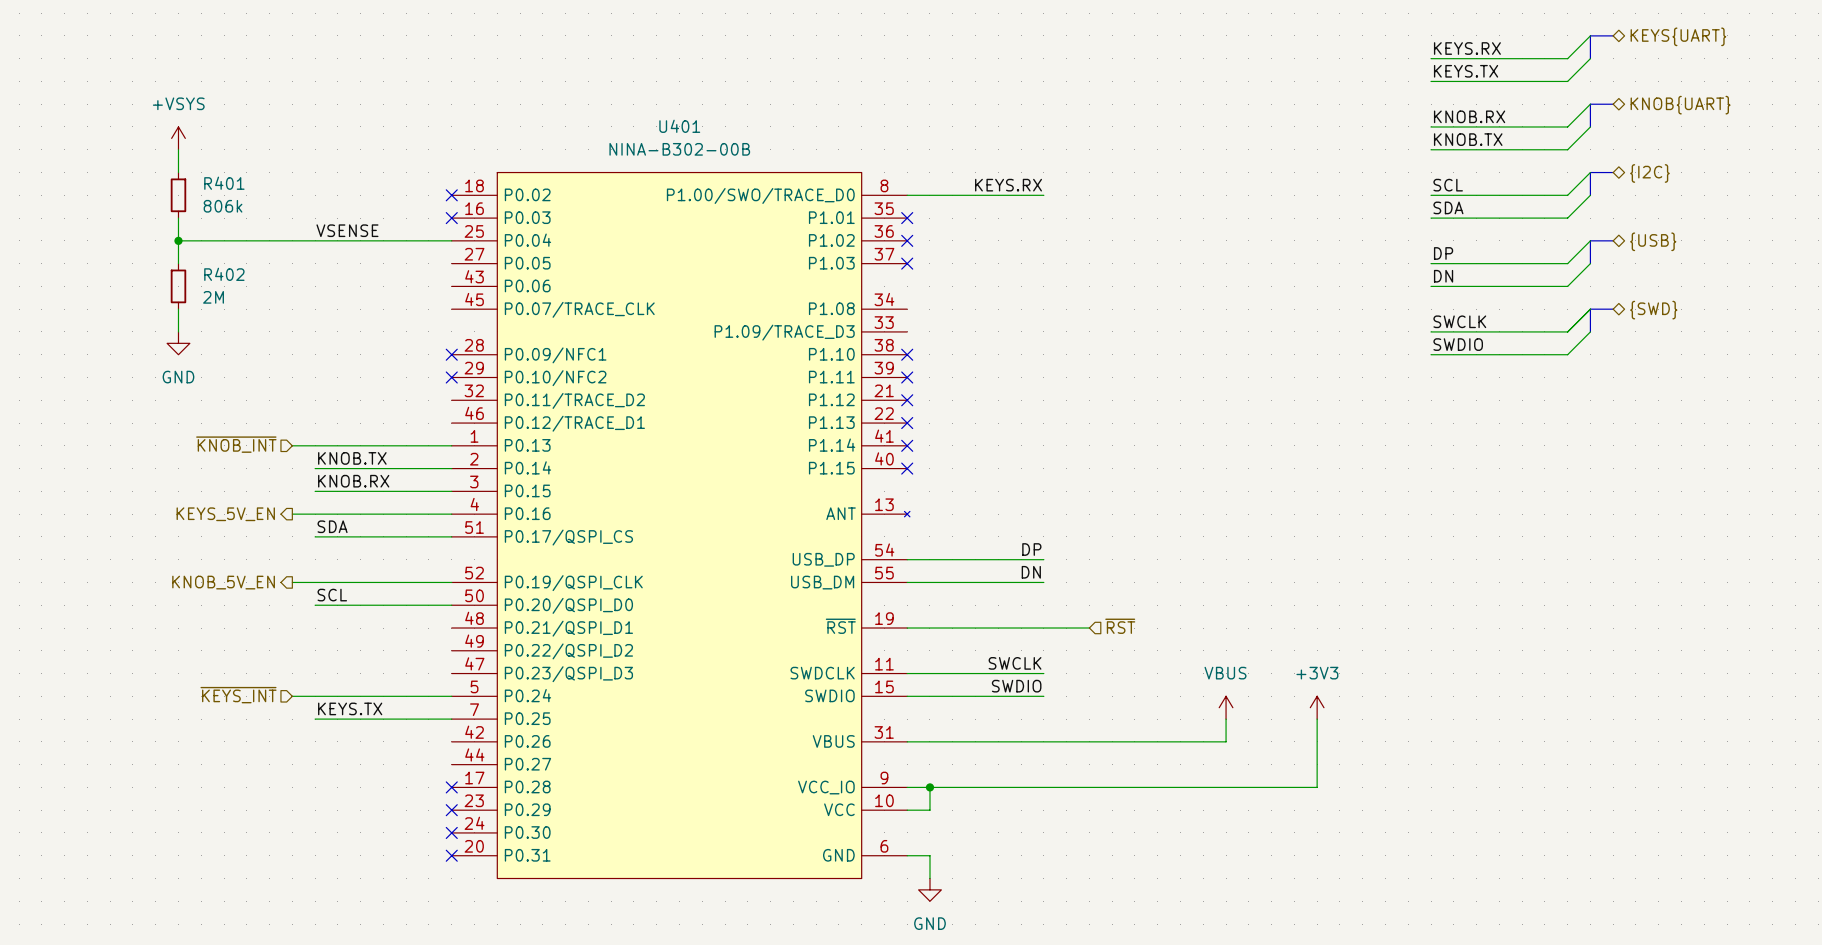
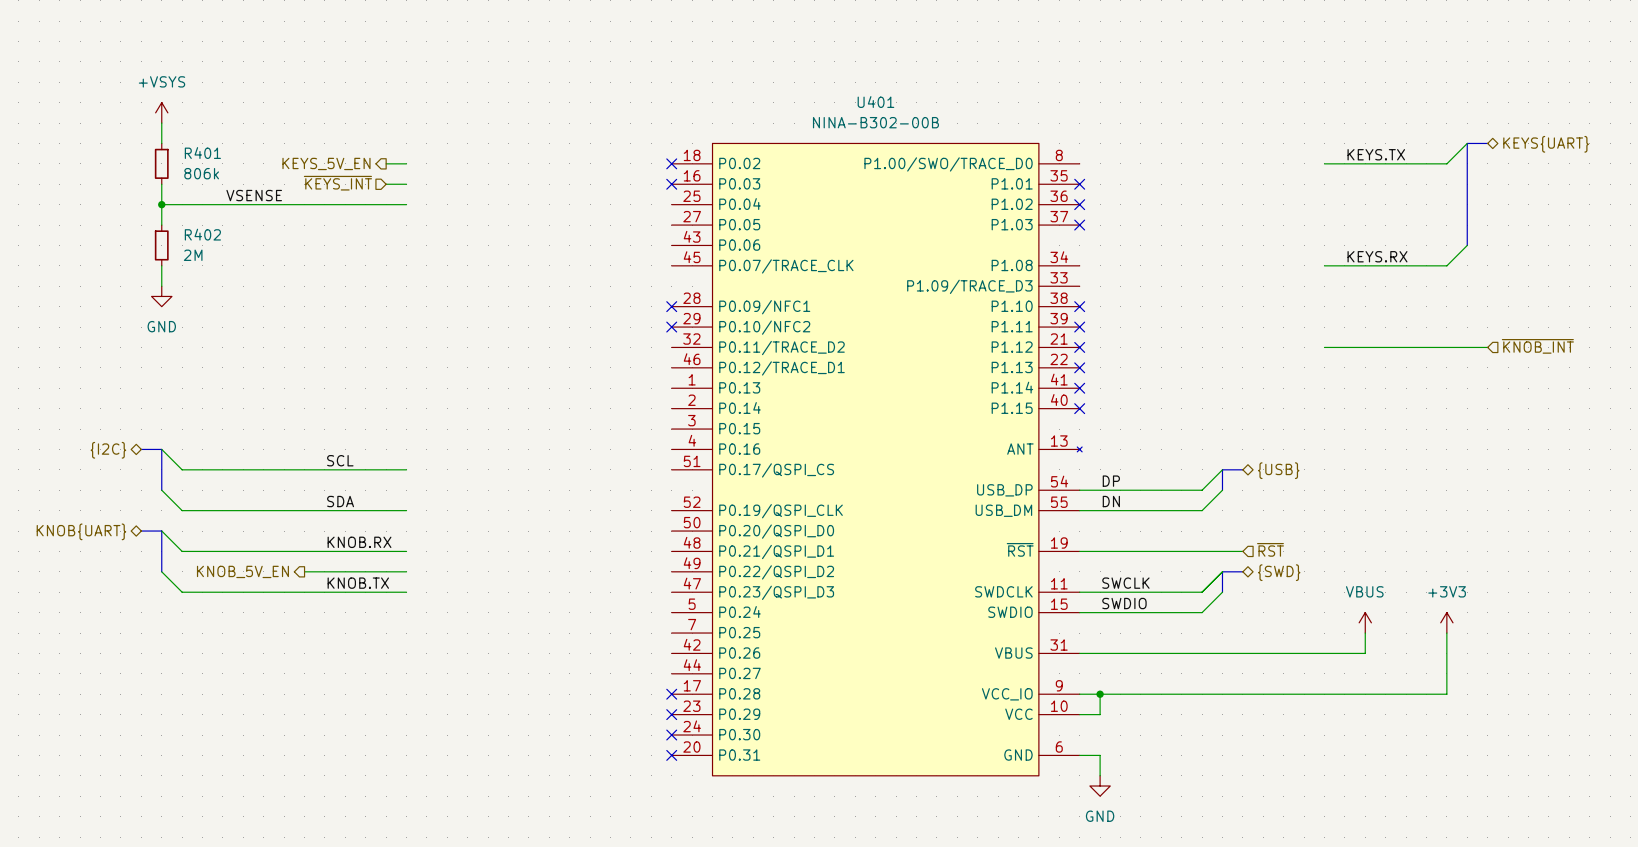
wire: (1590, 35) (1567, 58) (1431, 58) -> none
bus: (1613, 35) (1590, 35) (1590, 58) -> none
hierarchical label position: KEYS{UART} (1678, 36) -> KEYS{UART} (1546, 144)
label: KEYS.RX (1467, 48) -> none
wire: (1590, 58) (1567, 81) (1431, 81) -> none
label position: KEYS.TX (1466, 71) -> KEYS.TX (1376, 154)
wire: (1590, 104) (1567, 126) (1431, 126) -> none
bus: (1613, 104) (1590, 104) (1590, 126) -> none
hierarchical label: KNOB{UART} (1680, 105) -> none
label: KNOB.RX (1469, 116) -> none
wire: (1590, 126) (1567, 149) (1431, 149) -> none
label: KNOB.TX (1468, 139) -> none
wire: (1590, 172) (1567, 195) -> (1467, 143) (1446, 163) (1406, 163)
bus: (1613, 172) (1590, 172) (1590, 195) -> none
bus: none -> (1487, 143) (1467, 143) (1467, 245)
hierarchical label: {I2C} (1649, 173) -> none
label: KEYS.RX (1008, 185) -> none
label: SCL (1448, 185) -> none
hierarchical label: none -> KEYS_5V_EN (326, 163)
wire: none -> (386, 163) (406, 163)
no-connect mark: (451, 195) -> none
no-connect mark: none -> (671, 163)
wire: (1431, 195) (1476, 195) -> none
wire: (1590, 195) (1567, 218) (1431, 218) -> none
label: SDA (1448, 207) -> none
hierarchical label: none -> ~{KEYS_INT} (337, 183)
wire: none -> (386, 184) (406, 184)
no-connect mark: (451, 218) -> none
no-connect mark: none -> (671, 184)
no-connect mark: (907, 218) -> none
no-connect mark: none -> (1079, 184)
label position: VSENSE (347, 230) -> VSENSE (254, 195)
no-connect mark: (907, 240) -> none
no-connect mark: none -> (1079, 204)
wire: (1590, 240) (1567, 263) (1431, 263) -> none
bus: (1613, 240) (1590, 240) (1590, 263) -> none
hierarchical label: {USB} (1653, 241) -> none
label: DP (1443, 253) -> none
no-connect mark: (907, 263) -> none
no-connect mark: none -> (1079, 225)
wire: (1590, 263) (1567, 286) (1431, 286) -> (1467, 245) (1446, 265) (1324, 265)
label: DN (1443, 276) -> none
label: none -> KEYS.RX (1377, 256)
wire: (1590, 309) (1567, 331) (1431, 331) -> none
bus: (1613, 309) (1590, 309) (1590, 331) -> none
hierarchical label: {SWD} (1653, 310) -> none
label: SWCLK (1459, 321) -> none
wire: (1590, 331) (1567, 354) (1431, 354) -> none
label: SWDIO (1458, 344) -> none
no-connect mark: (451, 354) -> none
no-connect mark: none -> (671, 306)
no-connect mark: (907, 354) -> none
no-connect mark: none -> (1079, 306)
no-connect mark: (451, 377) -> none
no-connect mark: none -> (671, 327)
no-connect mark: (907, 377) -> none
no-connect mark: none -> (1079, 327)
hierarchical label: none -> ~{KNOB_INT} (1537, 346)
no-connect mark: (907, 400) -> none
no-connect mark: none -> (1079, 347)
wire: none -> (1324, 347) (1487, 347)
no-connect mark: (907, 423) -> none
no-connect mark: none -> (1079, 367)
hierarchical label: ~{KNOB_INT} (236, 444) -> none
wire: (292, 445) (451, 445) -> none
no-connect mark: (907, 445) -> none
no-connect mark: none -> (1079, 388)
label position: KNOB.TX (352, 458) -> KNOB.TX (358, 583)
wire: (315, 468) (451, 468) -> none
no-connect mark: (907, 468) -> none
no-connect mark: none -> (1079, 408)
label position: KNOB.RX (353, 481) -> KNOB.RX (359, 542)
wire: (315, 491) (451, 491) -> none
bus: none -> (141, 449) (161, 449) (161, 490)
wire: none -> (161, 449) (182, 469) (284, 469)
hierarchical label: KEYS_5V_EN (225, 514) -> none
wire: (292, 514) (451, 514) -> none
hierarchical label: none -> {I2C} (108, 450)
U401 position: (680, 525) -> (876, 459)
label position: SDA (332, 526) -> SDA (340, 501)
wire: none -> (1222, 469) (1202, 490) (1079, 490)
bus: none -> (1242, 469) (1222, 469) (1222, 490)
hierarchical label: none -> {USB} (1278, 470)
label: DP (1031, 549) -> none
label: none -> DP (1111, 481)
wire: none -> (161, 490) (182, 510) (263, 510)
wire: none -> (1222, 490) (1202, 510) (1079, 510)
label: DN (1031, 572) -> none
label: none -> DN (1111, 501)
hierarchical label position: KNOB_5V_EN (223, 582) -> KNOB_5V_EN (242, 571)
label position: SCL (332, 595) -> SCL (340, 460)
bus: none -> (141, 531) (161, 531) (161, 571)
wire: none -> (161, 531) (182, 551) (406, 551)
wire: (315, 605) (451, 605) -> none
hierarchical label: none -> KNOB{UART} (81, 531)
hierarchical label: ~{RST} (1120, 626) -> none
hierarchical label: none -> ~{RST} (1270, 549)
wire: none -> (1079, 551) (1242, 551)
wire: none -> (161, 571) (182, 592) (406, 592)
wire: none -> (304, 571) (406, 571)
wire: none -> (1222, 571) (1202, 592) (1079, 592)
bus: none -> (1242, 571) (1222, 571) (1222, 592)
hierarchical label: none -> {SWD} (1279, 572)
label position: SWCLK (1015, 663) -> SWCLK (1125, 583)
wire: none -> (1222, 592) (1202, 612) (1079, 612)
label position: SWDIO (1016, 686) -> SWDIO (1124, 603)
hierarchical label: ~{KEYS_INT} (238, 695) -> none
wire: (292, 696) (451, 696) -> none
power symbol: VBUS (1226, 707) -> none
power symbol: +3V3 (1317, 707) -> none
power symbol: none -> VBUS (1365, 622)
power symbol: none -> +3V3 (1446, 622)
label: KEYS.TX (350, 708) -> none
wire: (315, 719) (451, 719) -> none
wire: (1226, 719) (1226, 741) -> (1365, 633) (1365, 653) (1100, 653)
wire: (1317, 719) (1317, 787) -> (1446, 633) (1446, 694) (1181, 694)
no-connect mark: (451, 787) -> none
no-connect mark: none -> (671, 694)
junction: (929, 787) -> none
wire: none -> (1100, 694) (1100, 714) (1079, 714)
junction: none -> (1100, 694)
no-connect mark: (451, 810) -> none
no-connect mark: none -> (671, 714)
no-connect mark: (451, 832) -> none
no-connect mark: none -> (671, 735)
no-connect mark: (451, 855) -> none
no-connect mark: none -> (671, 755)
wire: none -> (1079, 755) (1100, 755) (1100, 775)
power symbol: GND (929, 889) -> none
power symbol: none -> GND (1100, 786)

